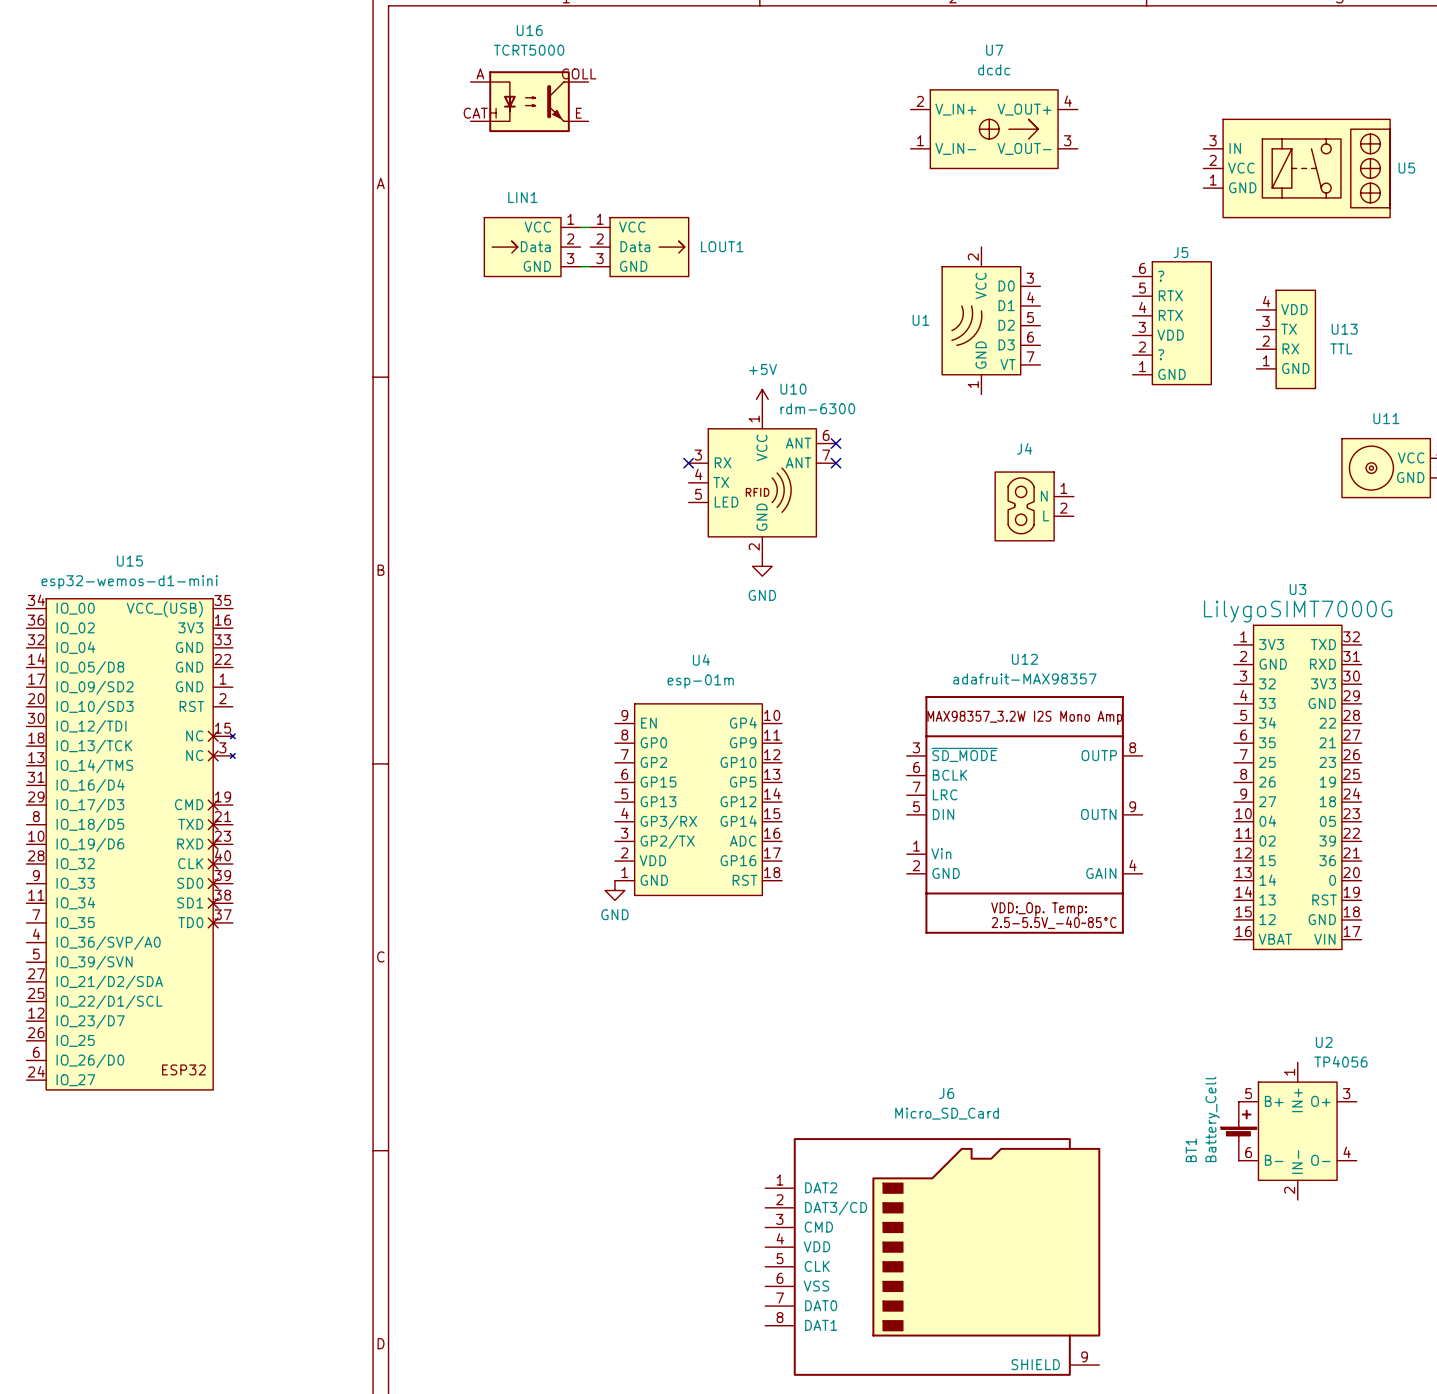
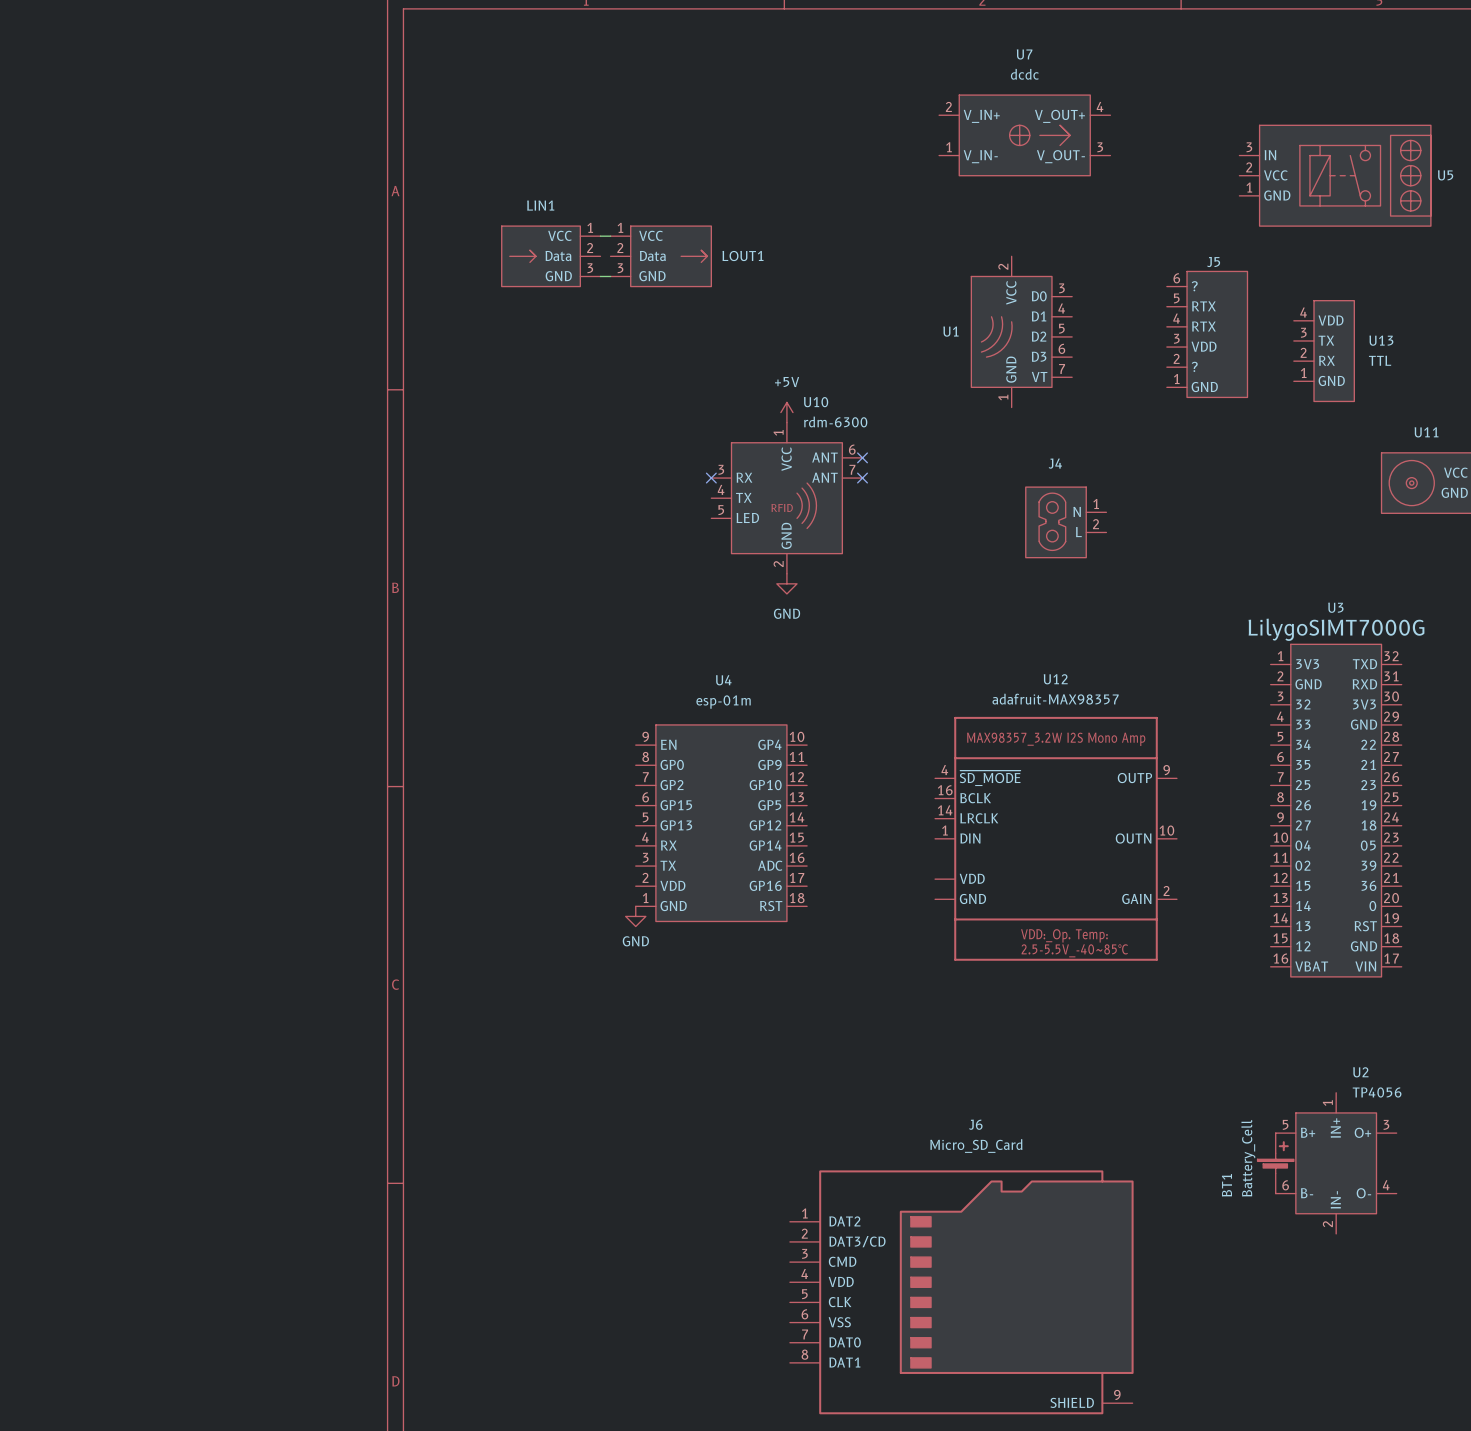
U16: TCRT5000 (529, 101) -> none
U12 symbol: [906, 696, 1143, 934] -> [935, 716, 1177, 961]
U4 pin name: GP3/RX (668, 822) -> RX (668, 845)
U4 pin name: GP2/TX (667, 841) -> TX (668, 865)
U15: esp32-wemos-d1-mini (130, 844) -> none

